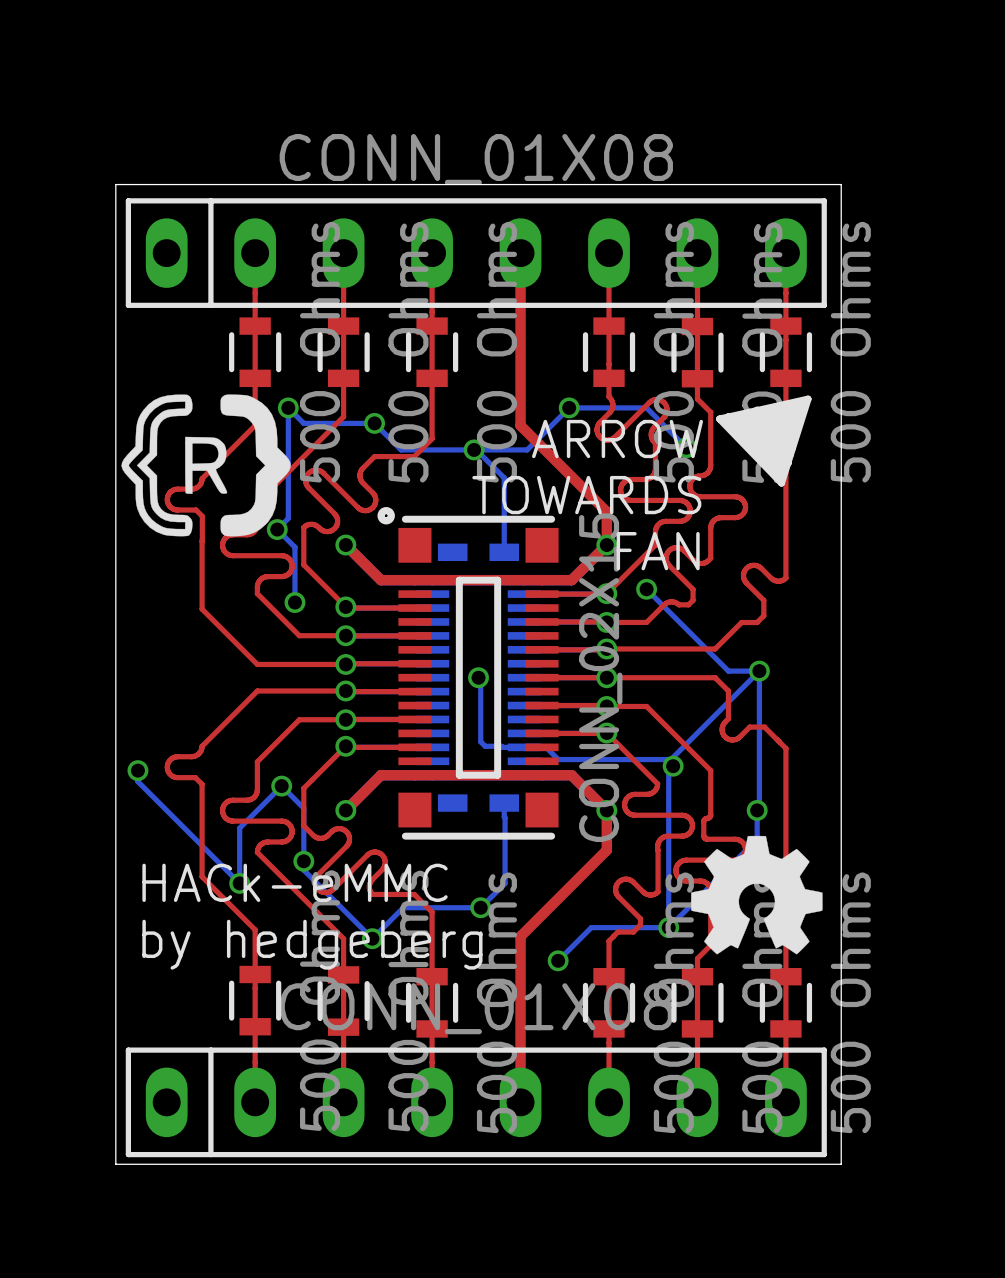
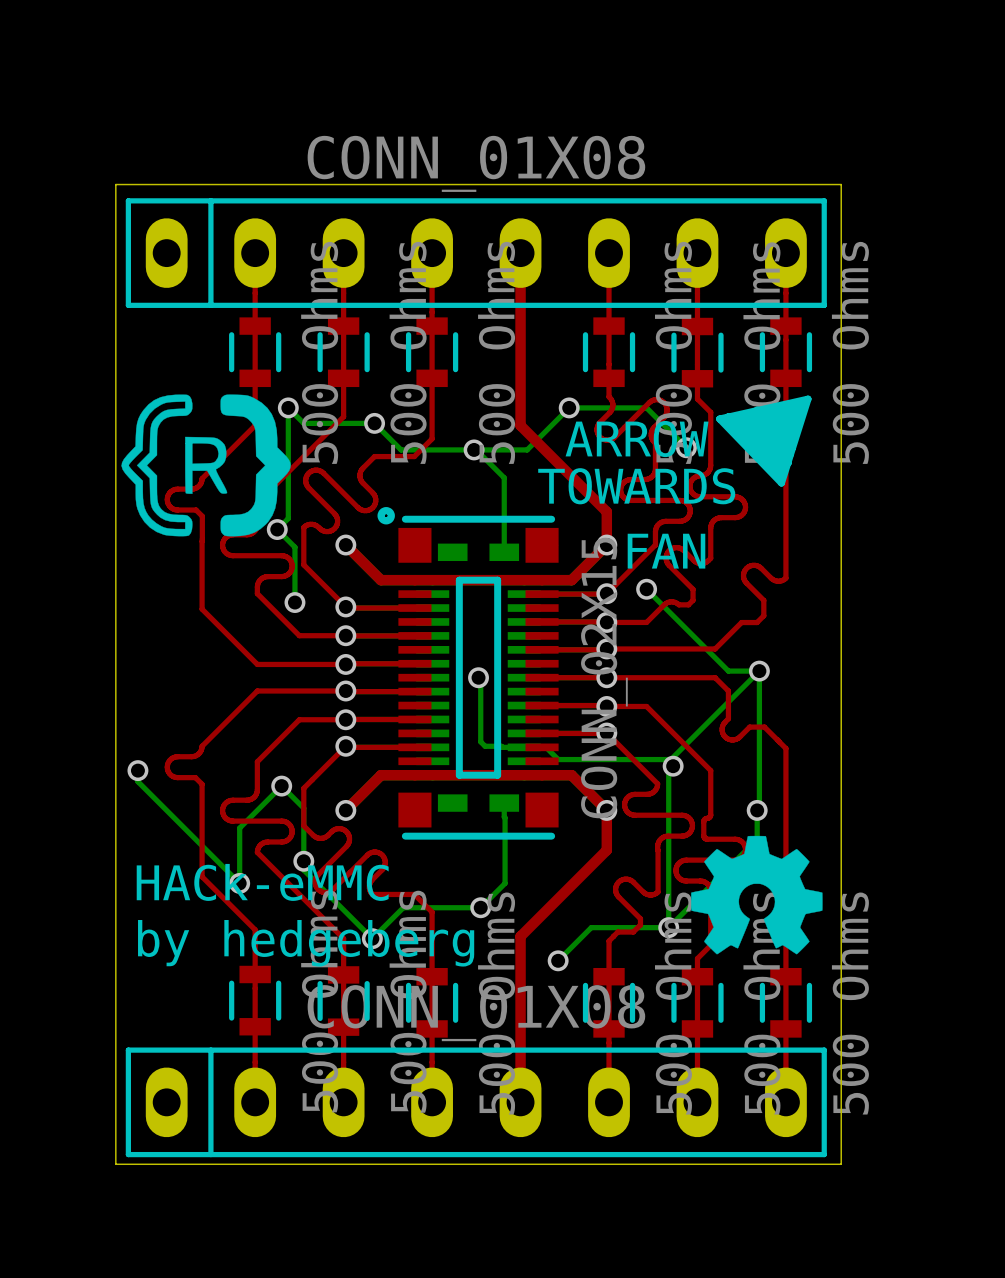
text position: TOWARDS (586, 495) -> TOWARDS (636, 486)

